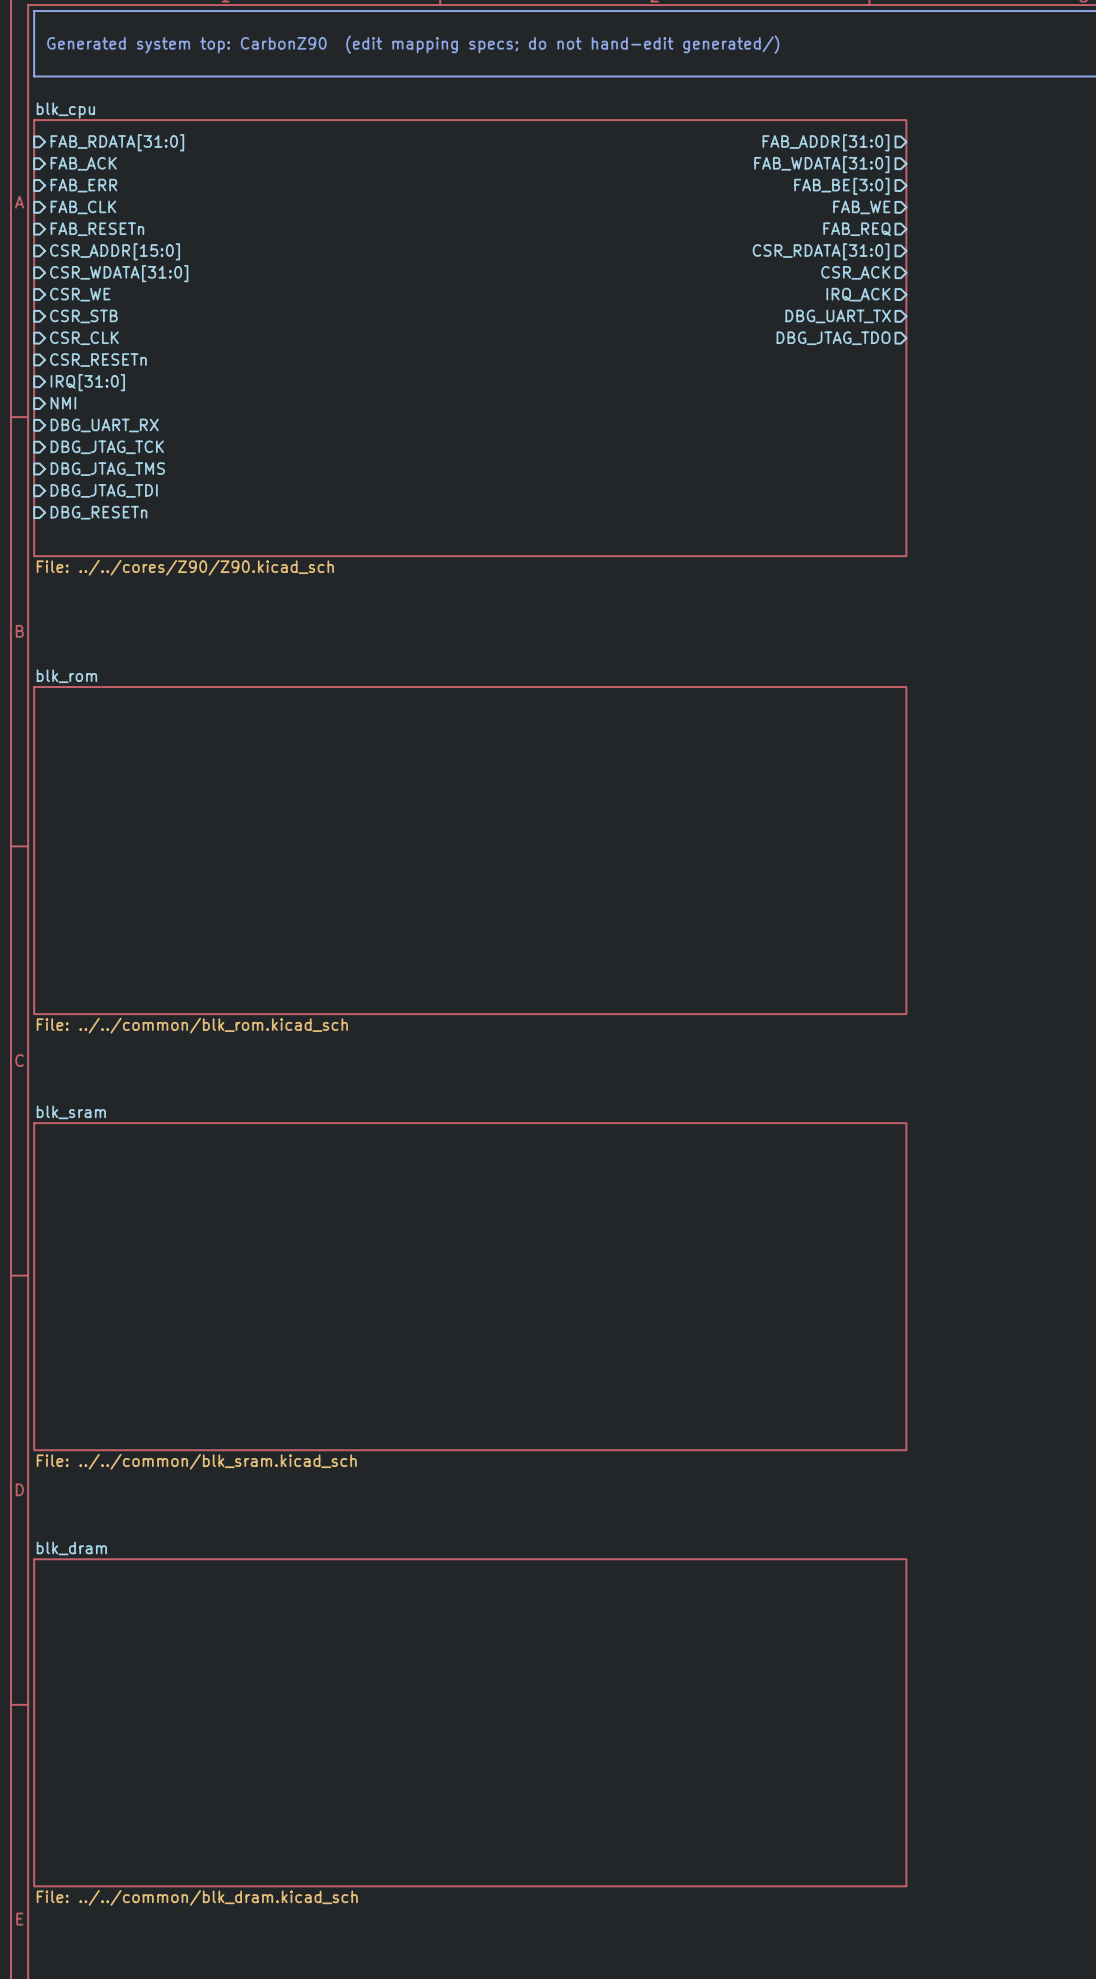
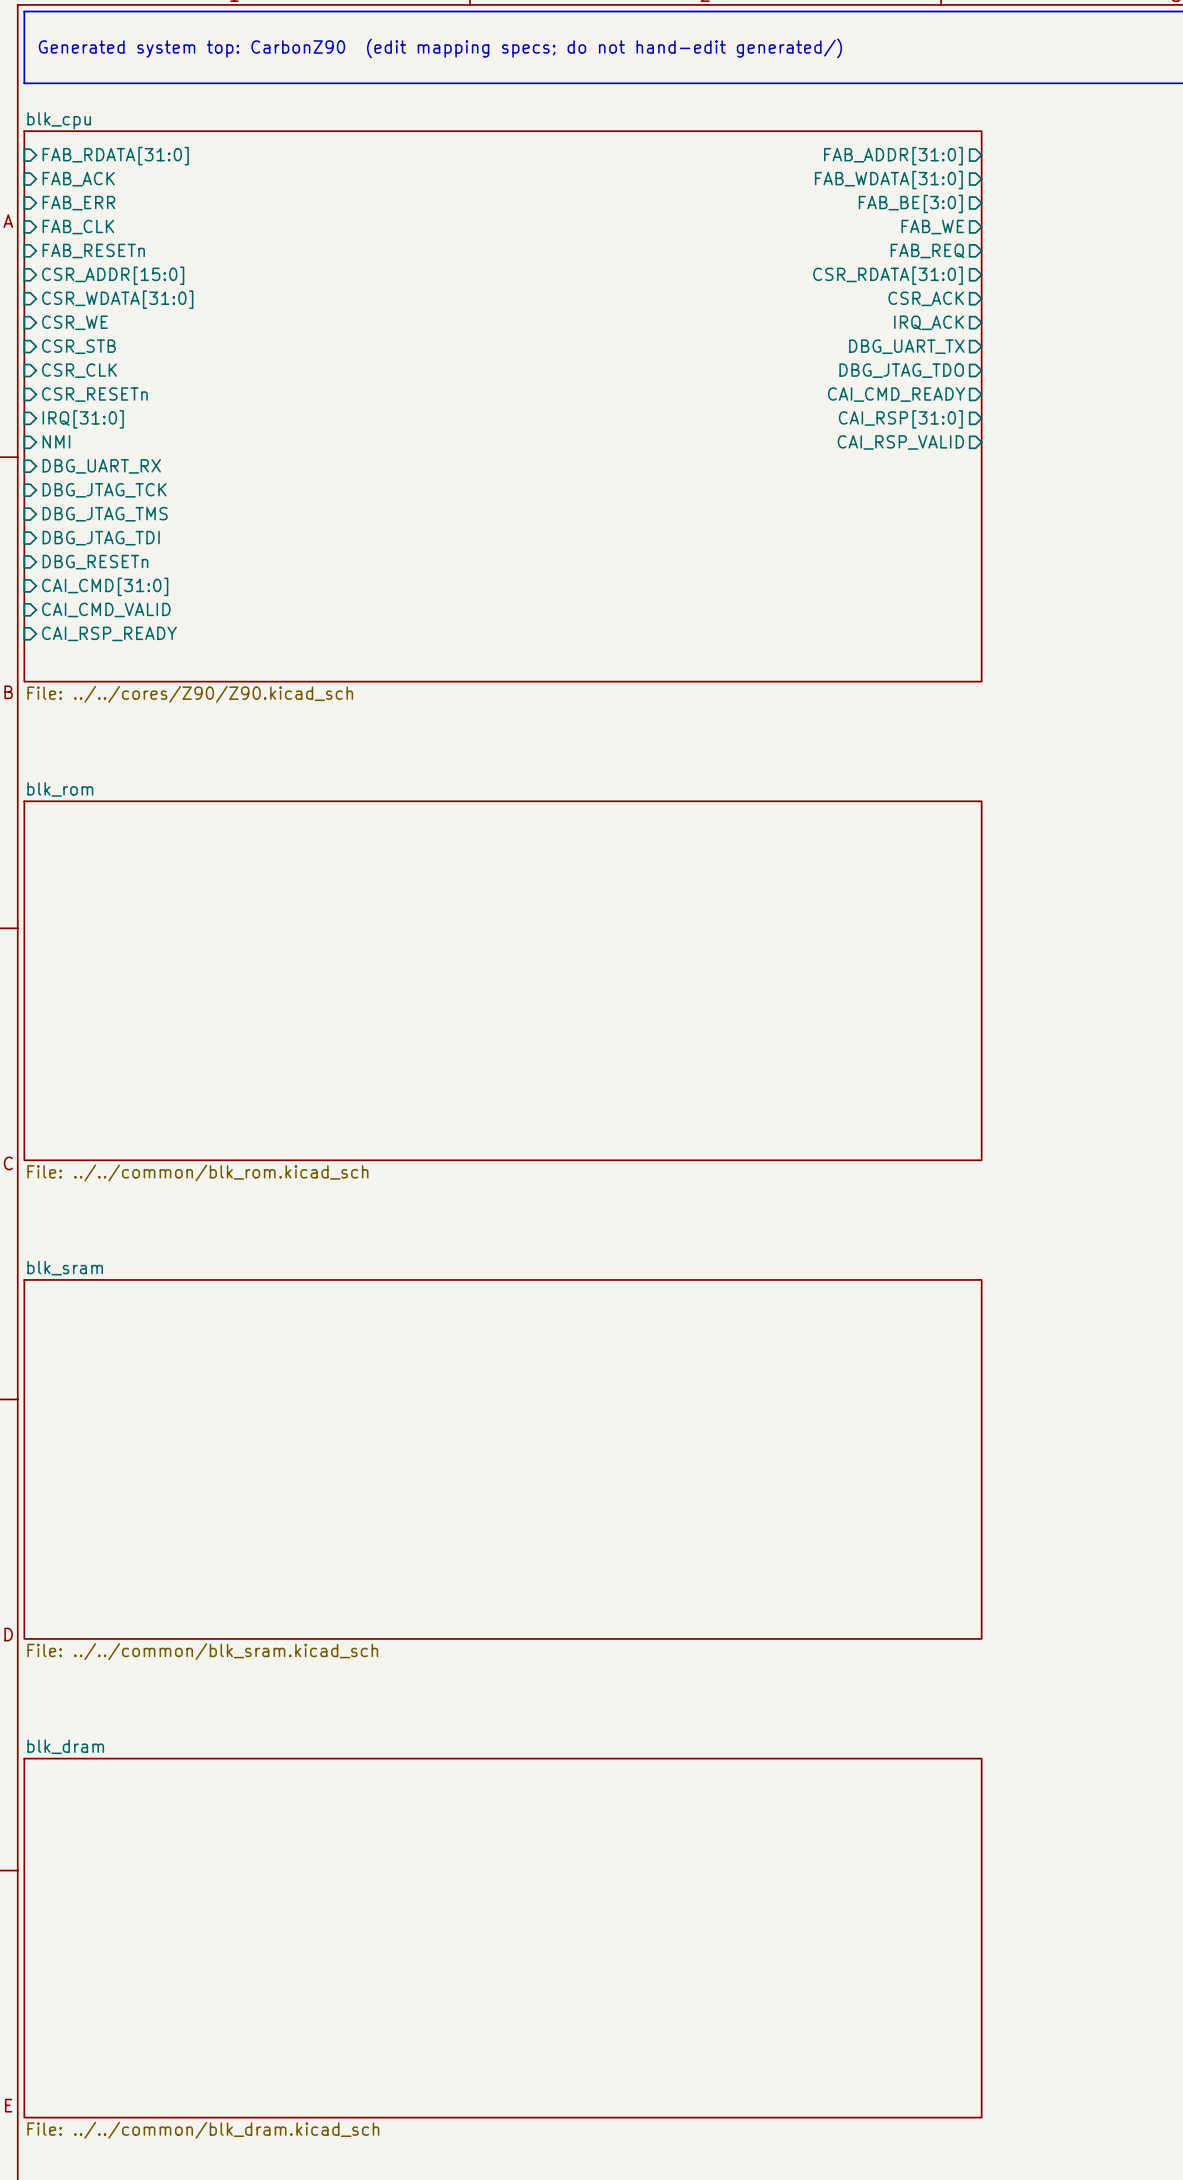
sheet blk_cpu: File: ../../cores/Z90/Z90.kicad_sch (470, 338) -> none
sheet pin: none -> CAI_CMD_READY (896, 394)
sheet blk_cpu: none -> File: ../../cores/Z90/Z90.kicad_sch (503, 406)
sheet pin: none -> CAI_RSP[31:0] (900, 419)
sheet pin: none -> CAI_RSP_VALID (900, 442)
sheet pin: none -> CAI_CMD[31:0] (105, 586)
sheet pin: none -> CAI_CMD_VALID (106, 609)
sheet pin: none -> CAI_RSP_READY (109, 633)
sheet blk_rom position: (470, 850) -> (503, 980)
sheet blk_sram position: (470, 1286) -> (503, 1459)
sheet blk_dram position: (470, 1722) -> (503, 1938)

